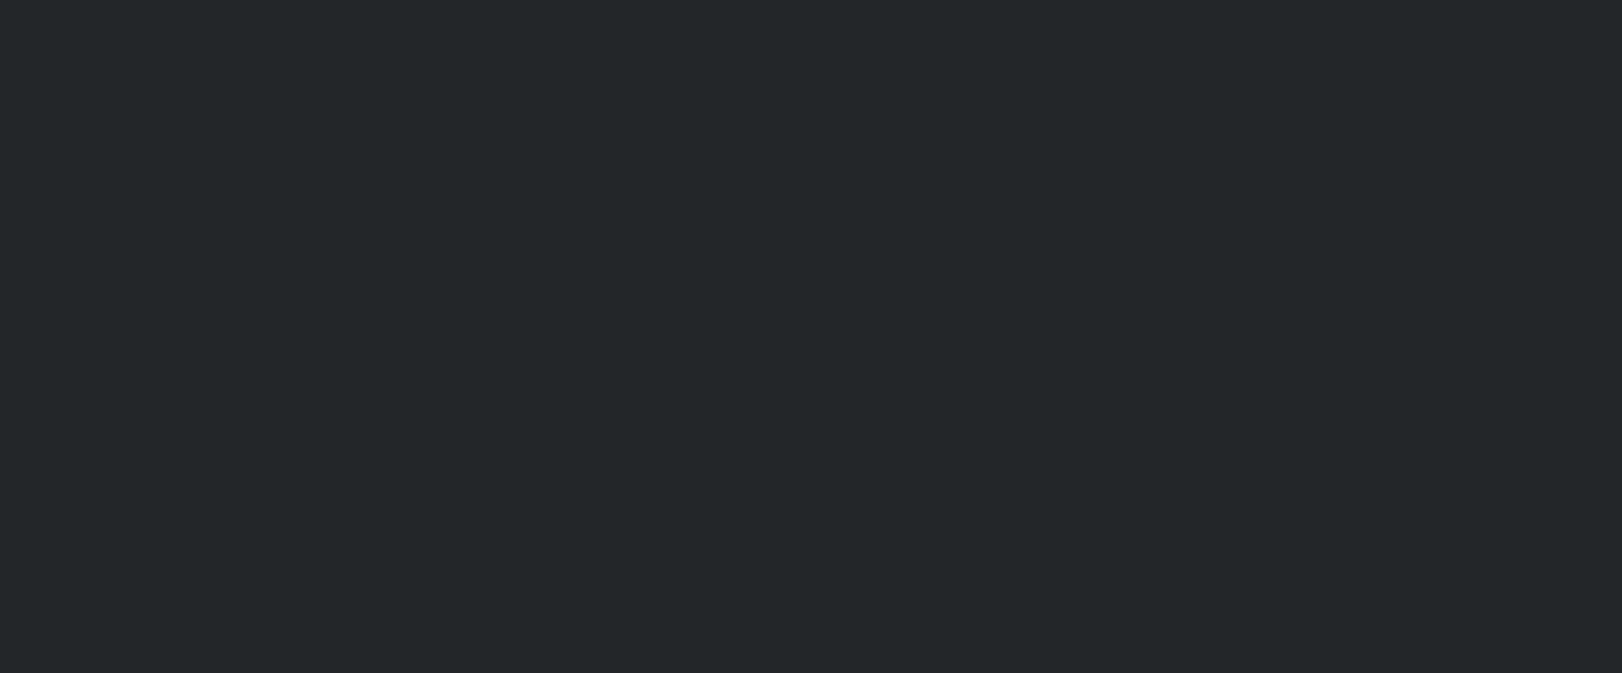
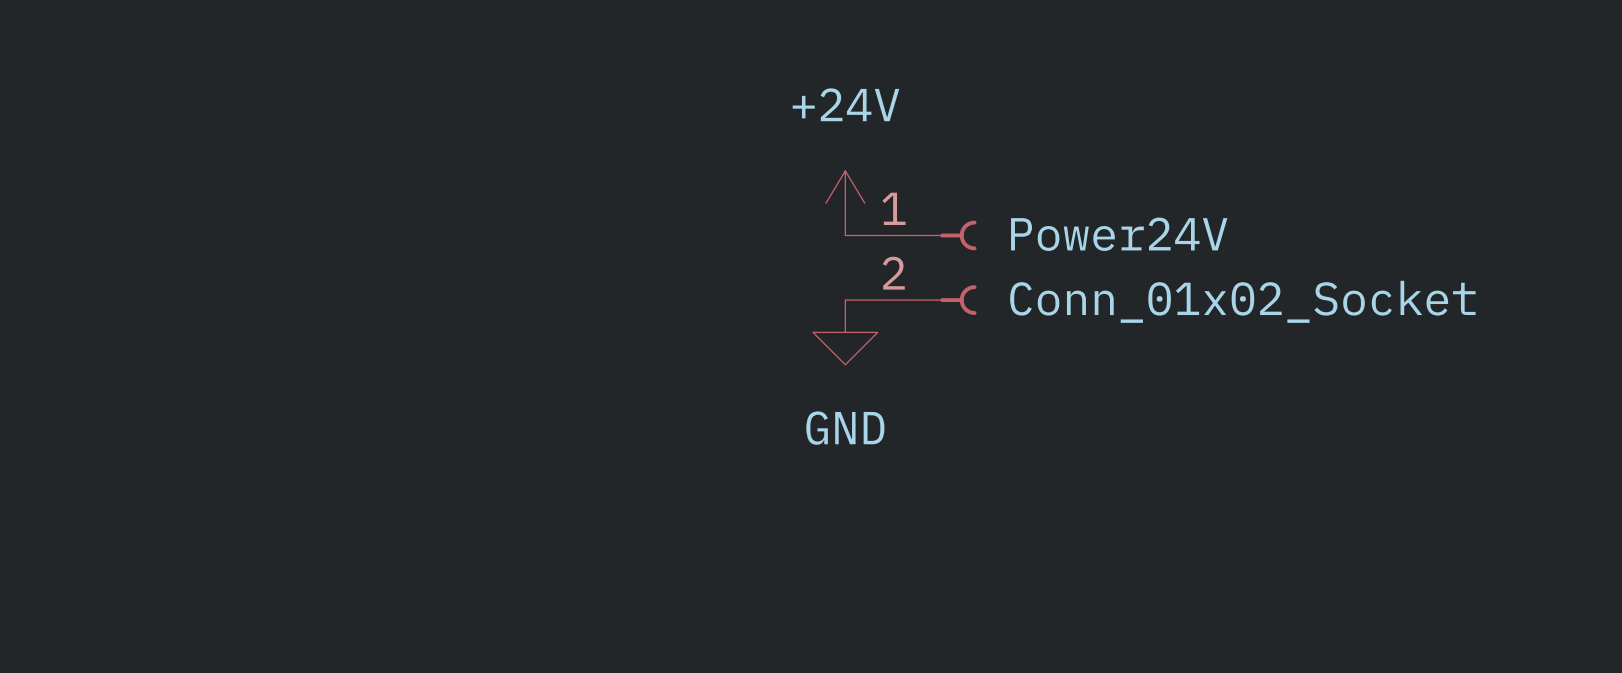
power symbol: none -> +24V (845, 203)
Power24V: none -> Conn_01x02_Socket (910, 267)
power symbol: none -> GND (845, 332)

